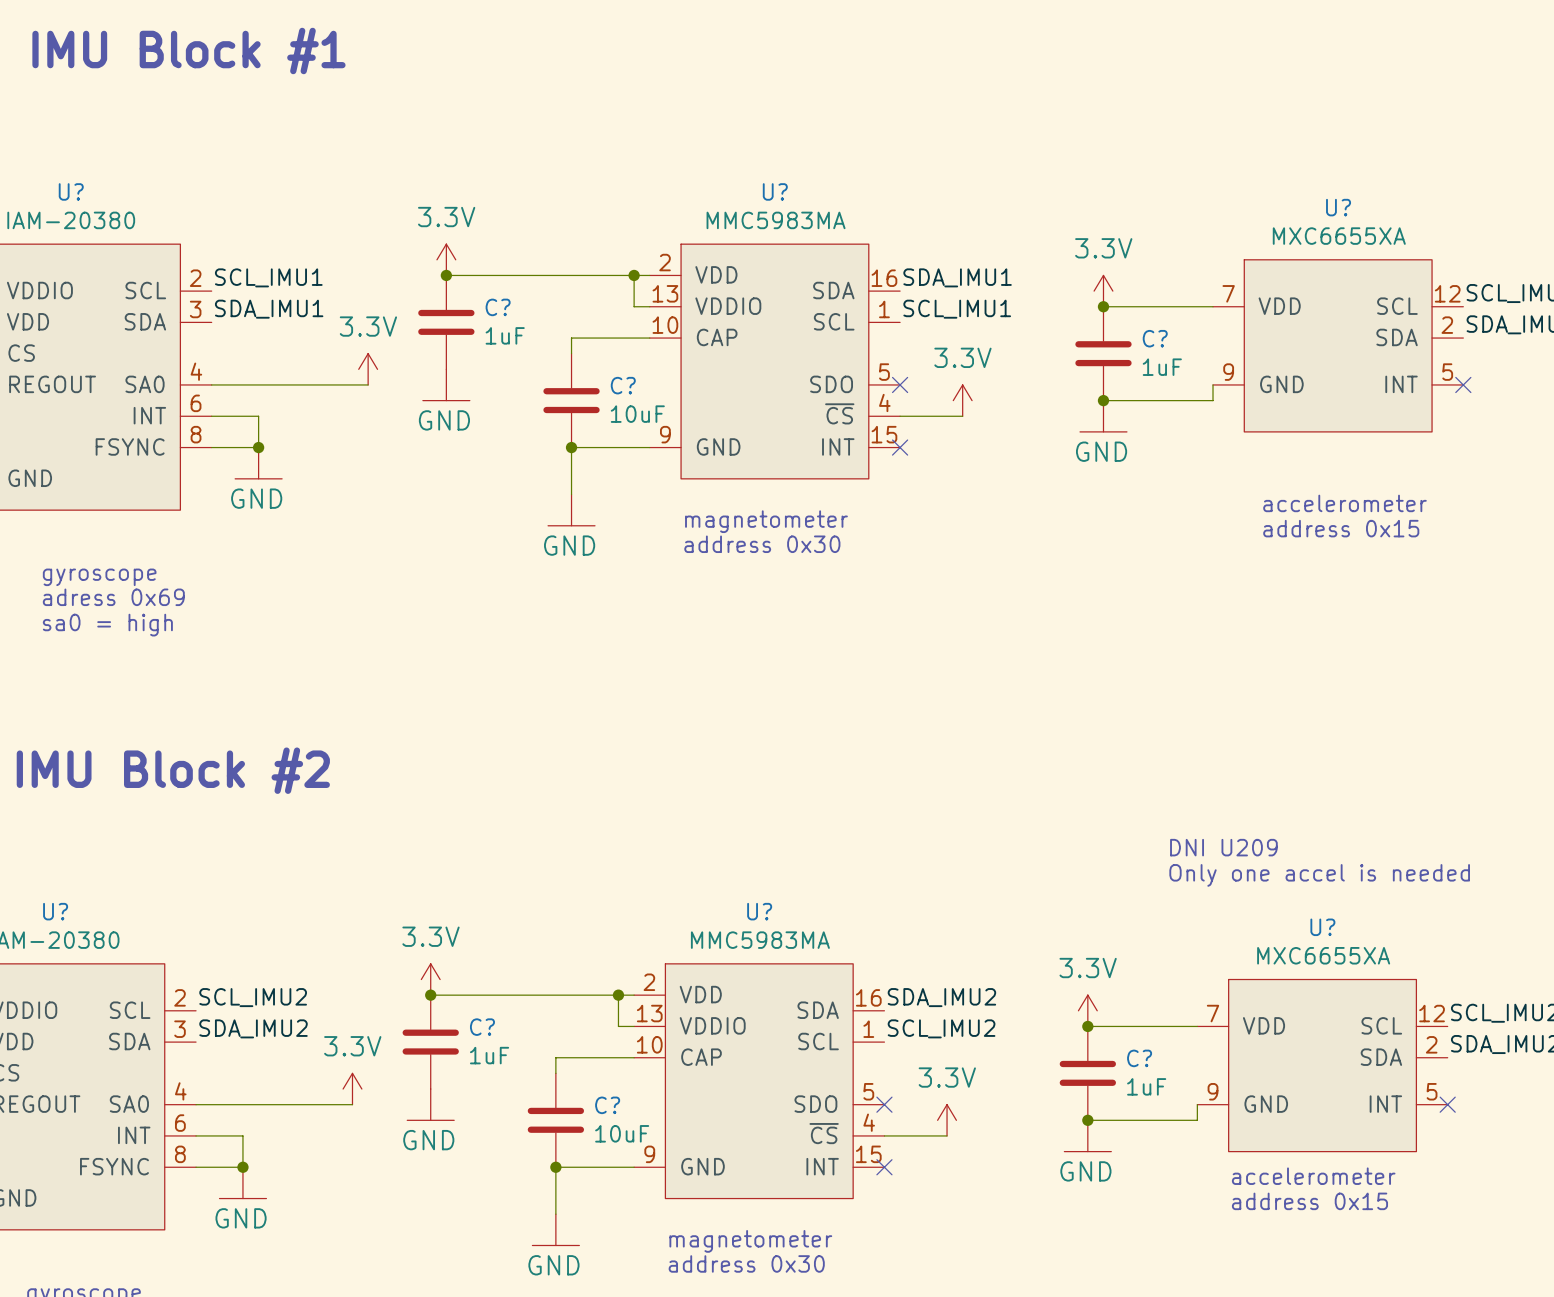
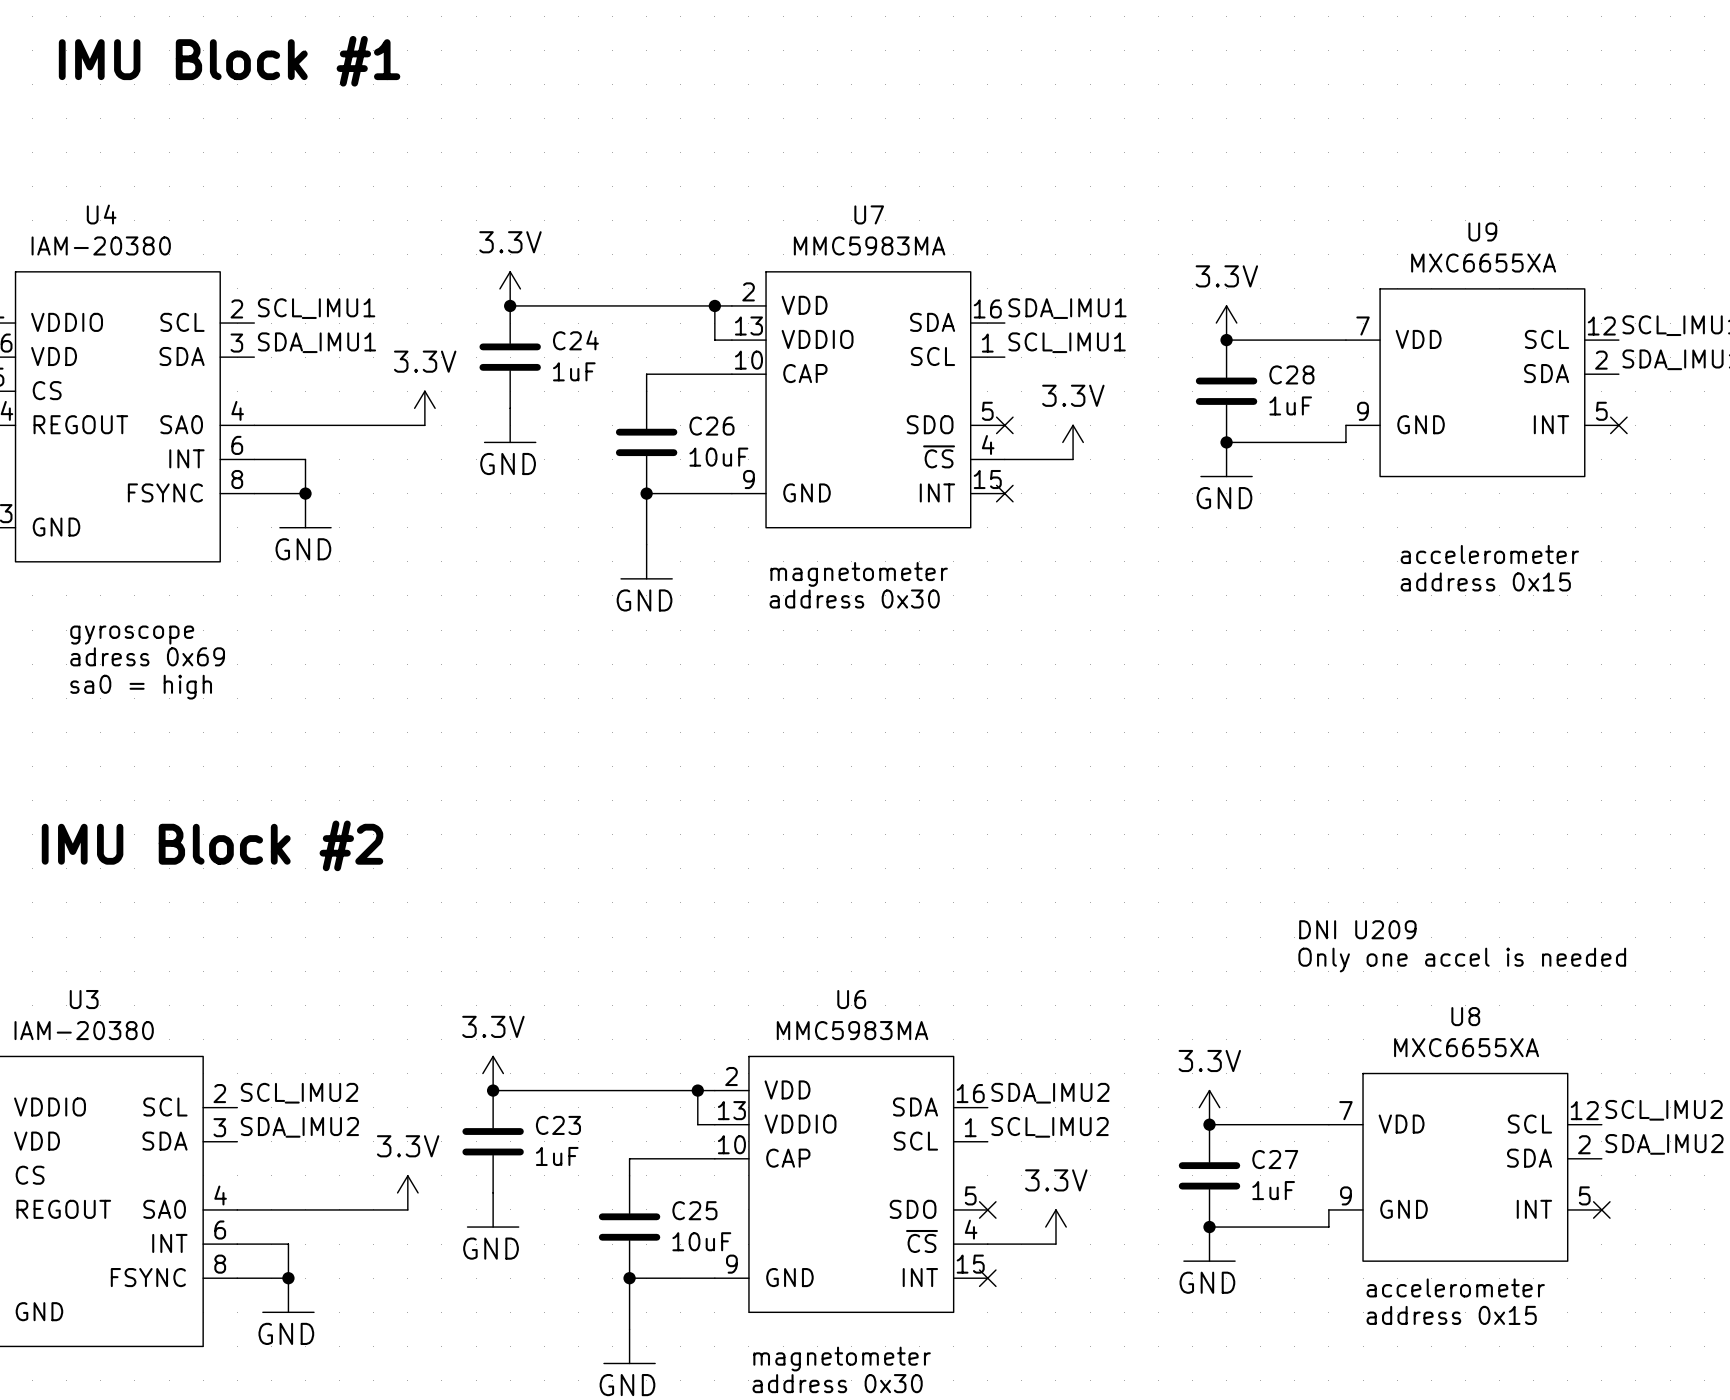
U? name: U? (71, 191) -> U4 (101, 214)
U? name: U? (775, 191) -> U7 (869, 214)
U? name: U? (1338, 207) -> U9 (1482, 231)
C? name: C? (498, 307) -> C24 (575, 340)
C? name: C? (1155, 338) -> C28 (1291, 374)
C? name: C? (623, 385) -> C26 (711, 426)
U? name: U? (55, 911) -> U3 (84, 999)
U? name: U? (759, 911) -> U6 (851, 999)
U? name: U? (1322, 927) -> U8 (1465, 1016)
C? name: C? (482, 1027) -> C23 (558, 1125)
C? name: C? (1139, 1058) -> C27 (1275, 1159)
C? name: C? (607, 1105) -> C25 (694, 1210)

